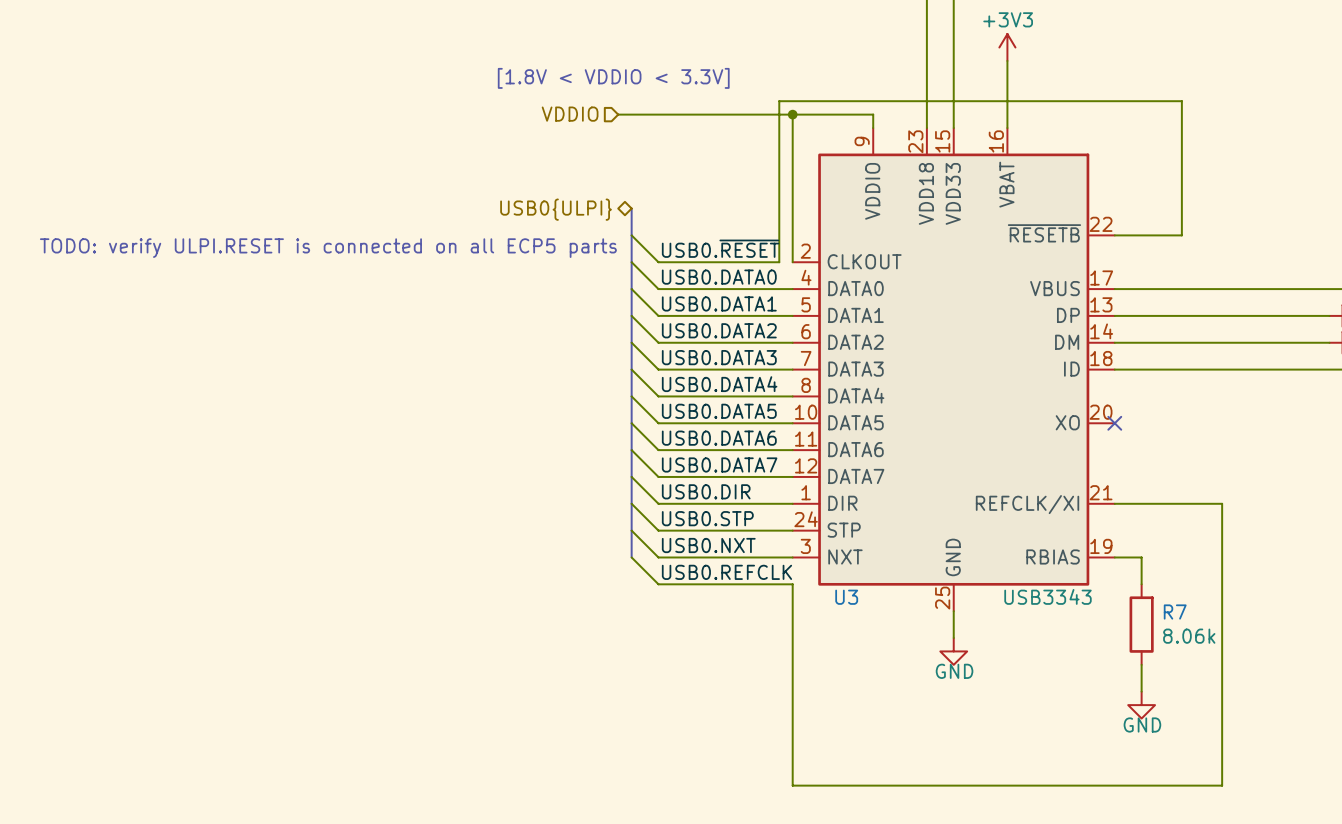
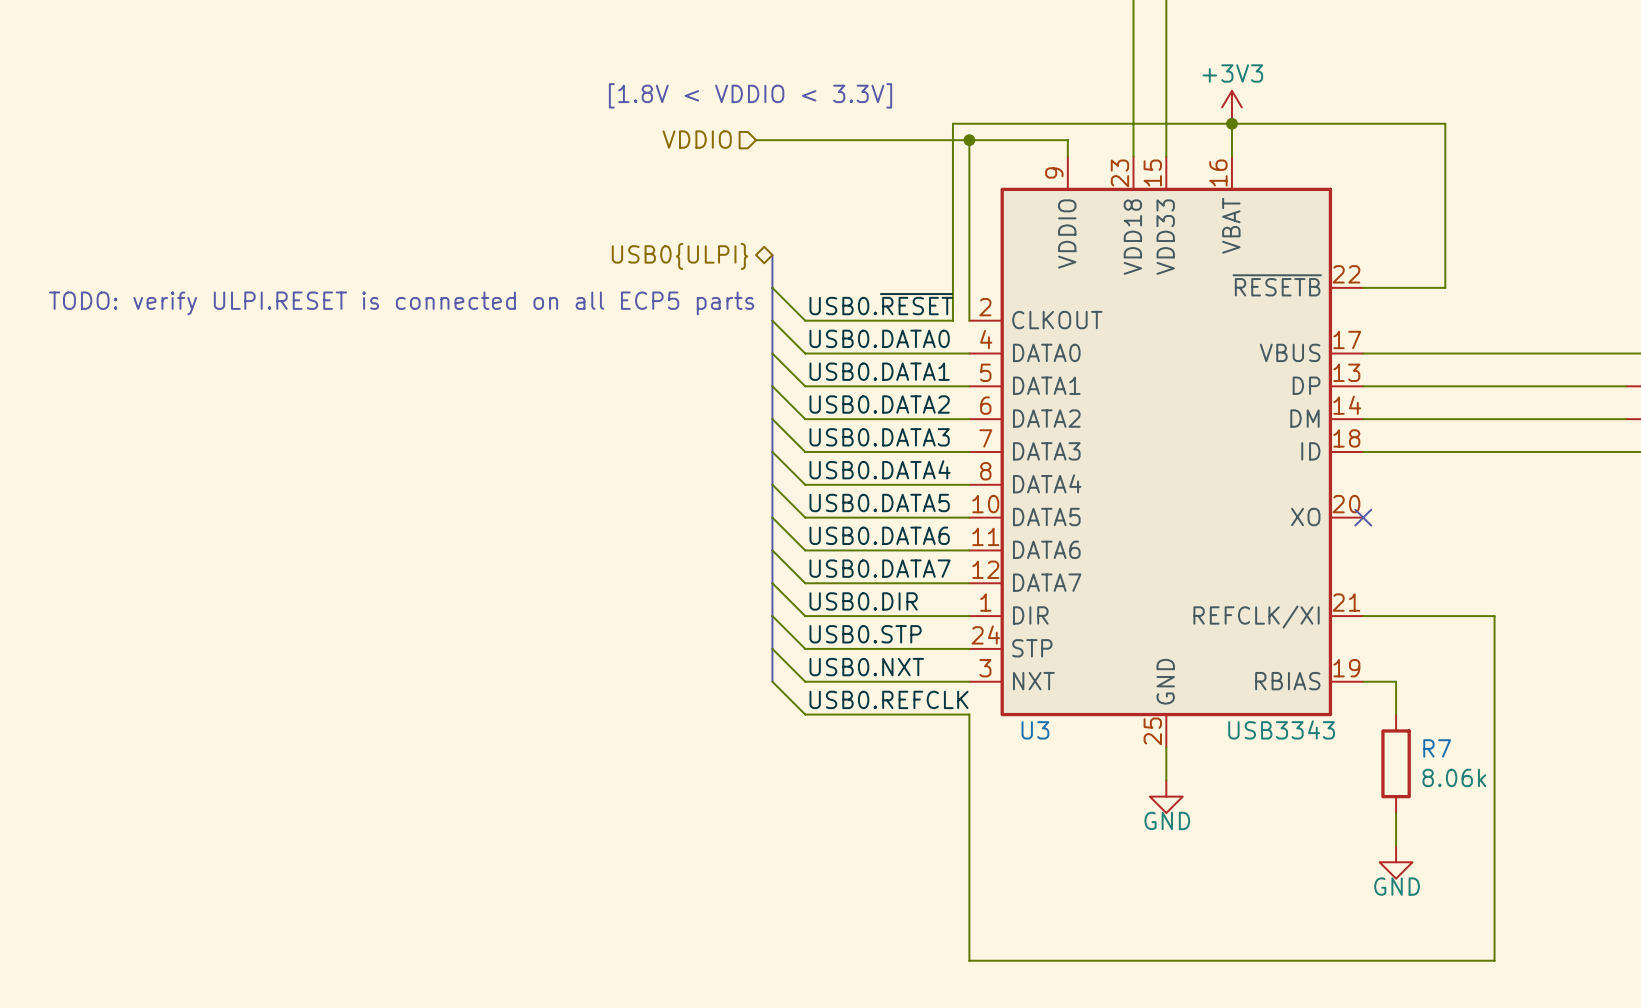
power symbol position: +3V3 (1007, 47) -> +3V3 (1231, 107)
junction: none -> (1231, 123)

